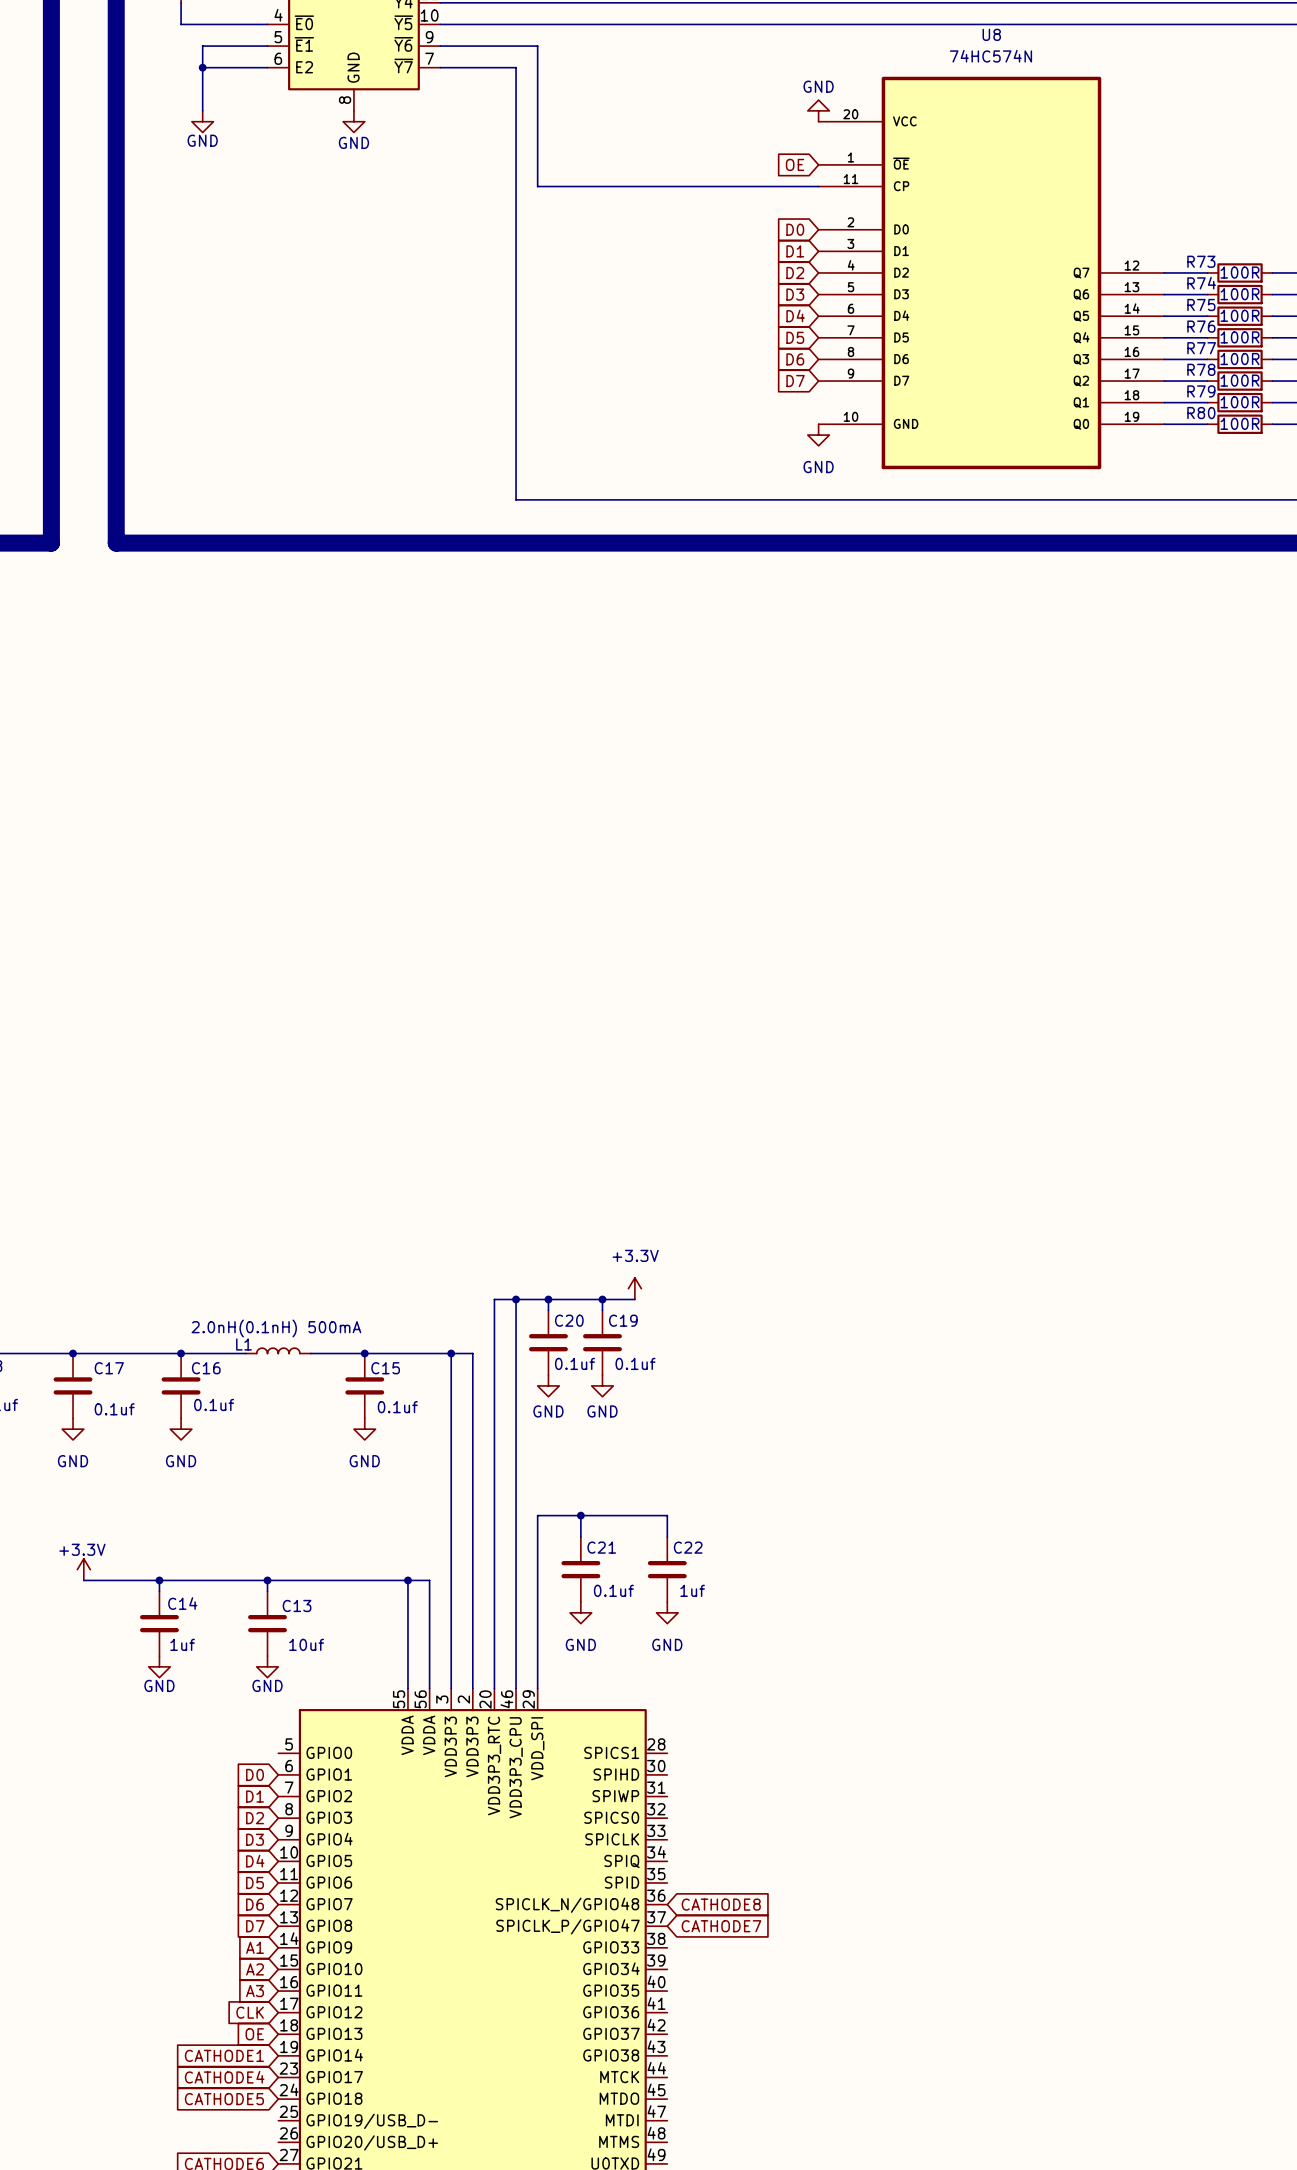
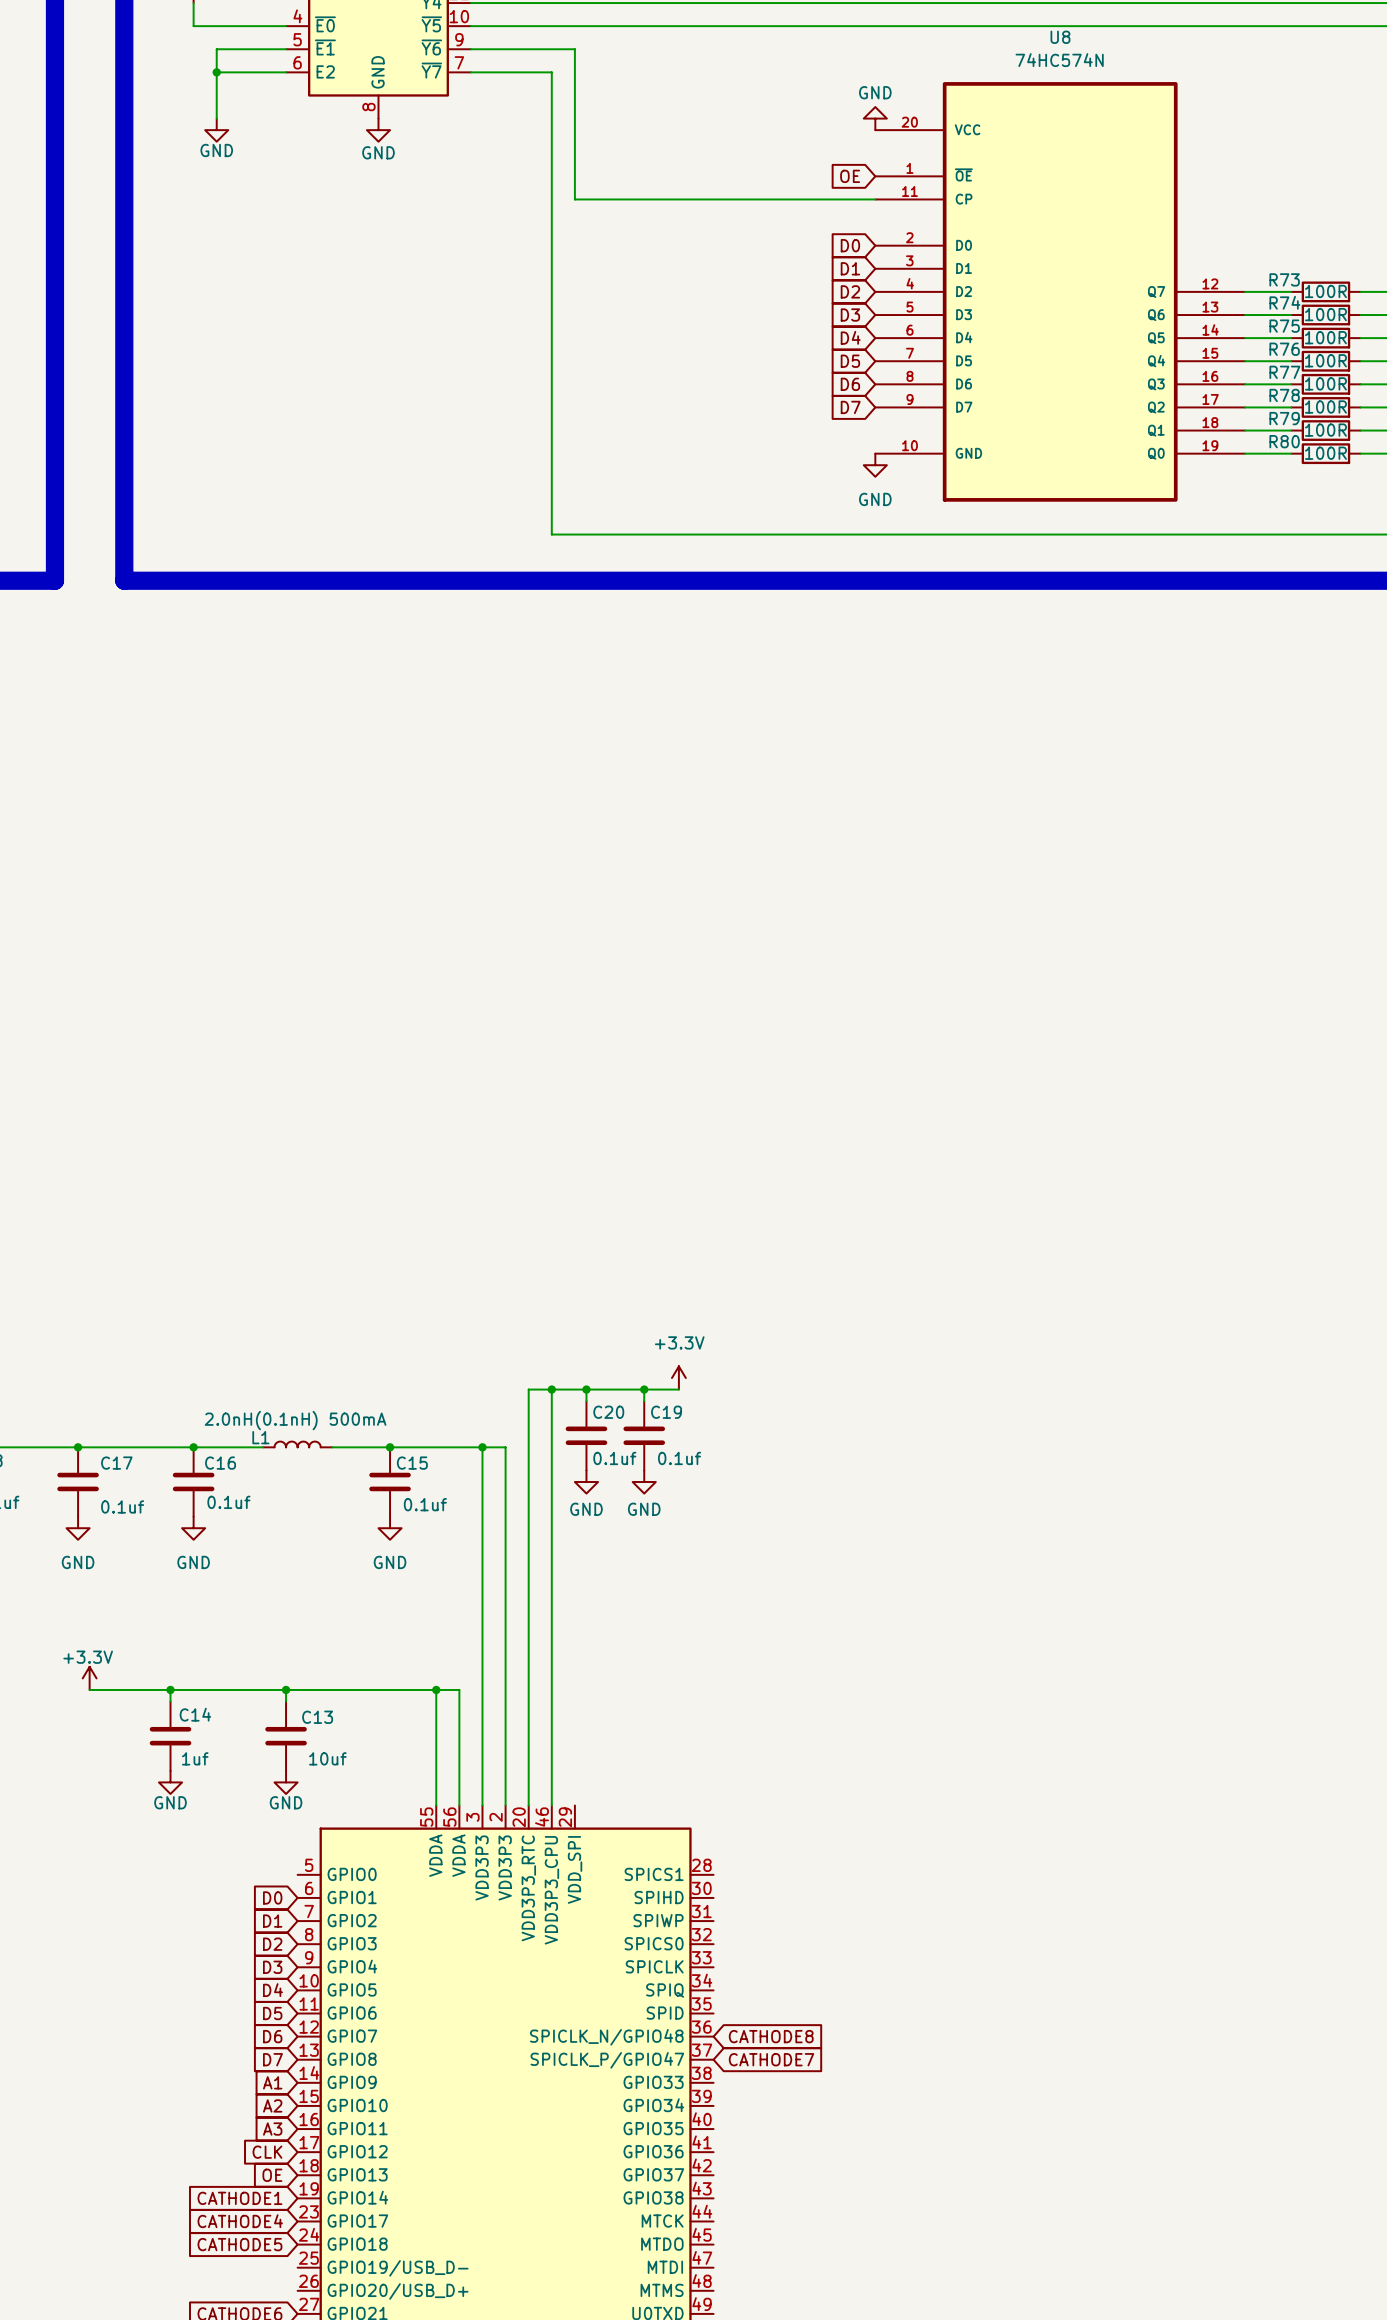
wire: (580, 1515) (580, 1537) -> none
junction: (580, 1515) -> none
wire: (667, 1537) (667, 1515) (537, 1515) (537, 1688) -> none
C21: 0.1uf (580, 1569) -> none
C22: 1uf (667, 1569) -> none
power symbol: GND (580, 1612) -> none
power symbol: GND (667, 1612) -> none

